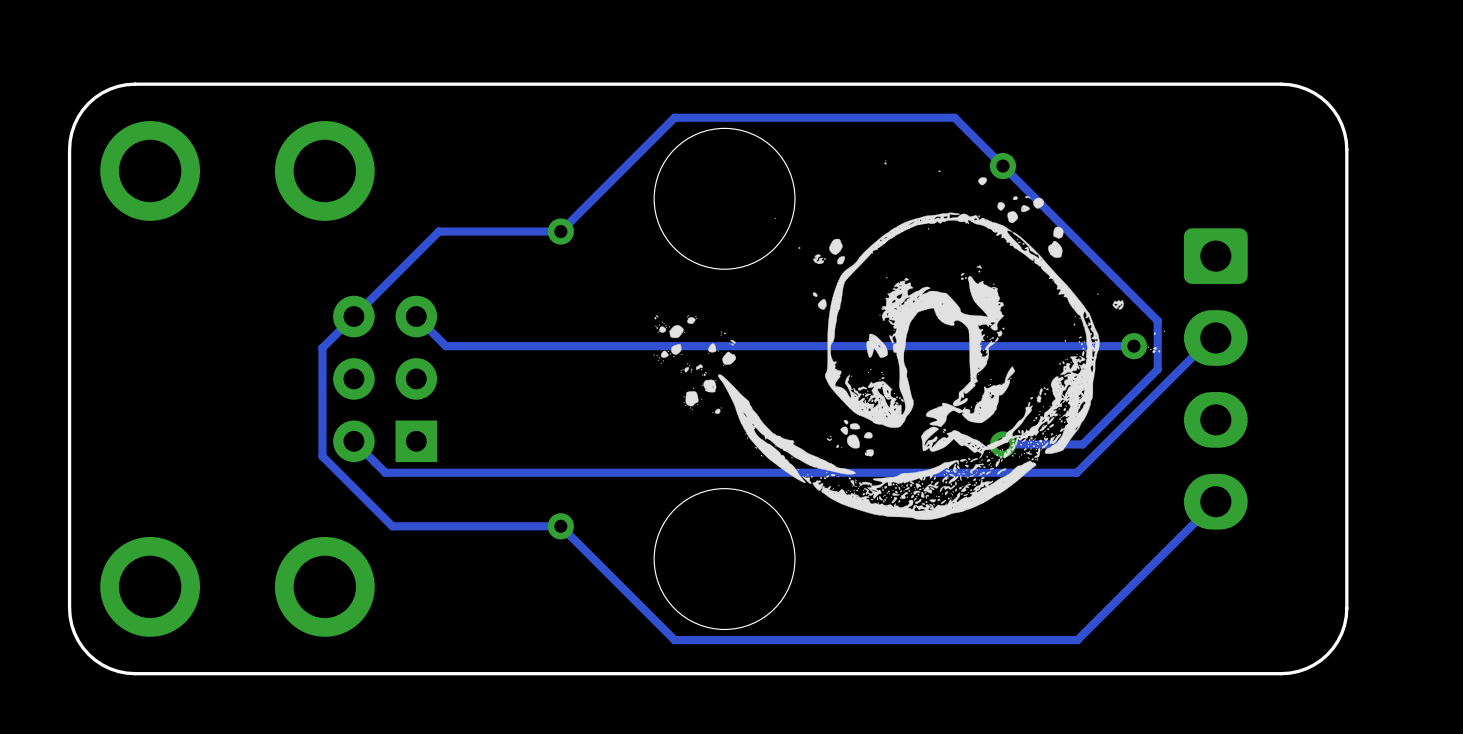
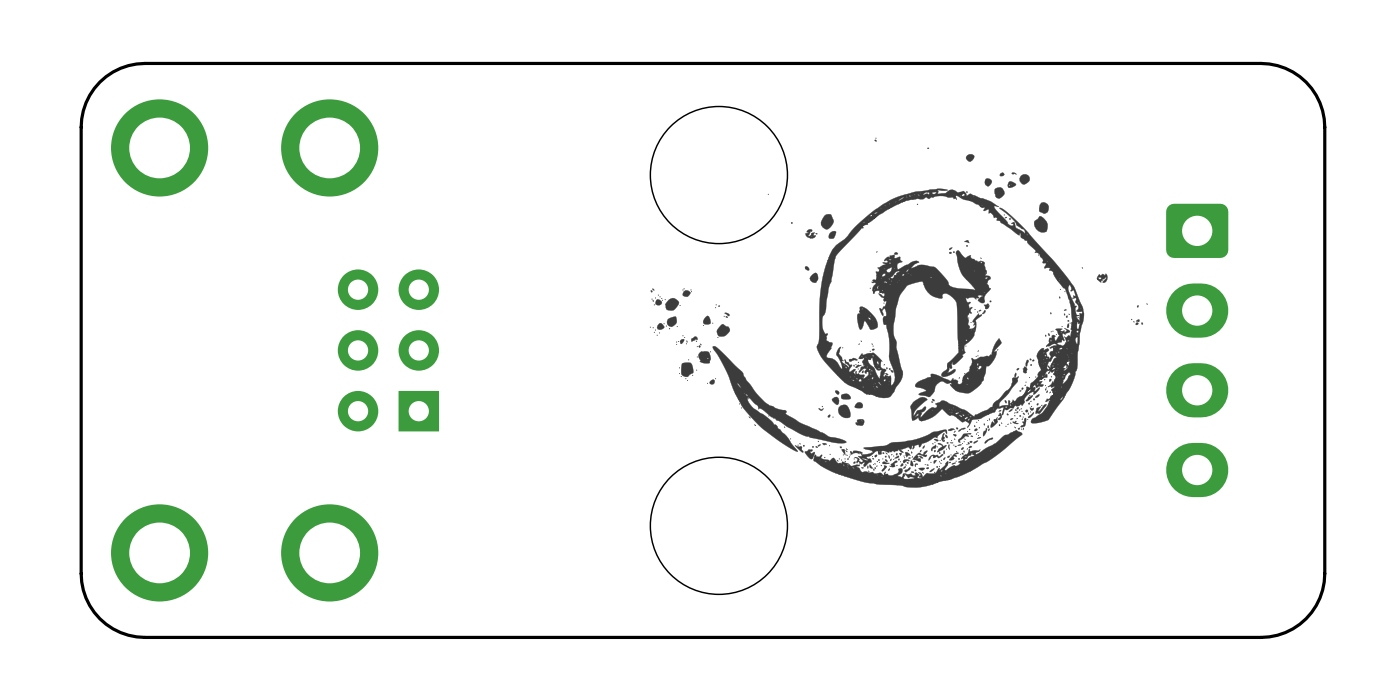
via: (1002, 166) -> none
via: (560, 231) -> none
track: (416, 316) (445, 346) (1133, 346) -> none
track: (1215, 337) (1211, 337) (1076, 472) (385, 472) (353, 441) -> none
via: (1133, 346) -> none
track: (1002, 444) (1082, 444) (1157, 369) (1157, 320) (954, 117) (674, 117) (560, 231) (438, 231) (322, 347) (322, 456) (392, 526) (560, 526) (674, 640) (1077, 640) (1215, 501) -> none
via: (1002, 444) -> none
via: (560, 526) -> none

